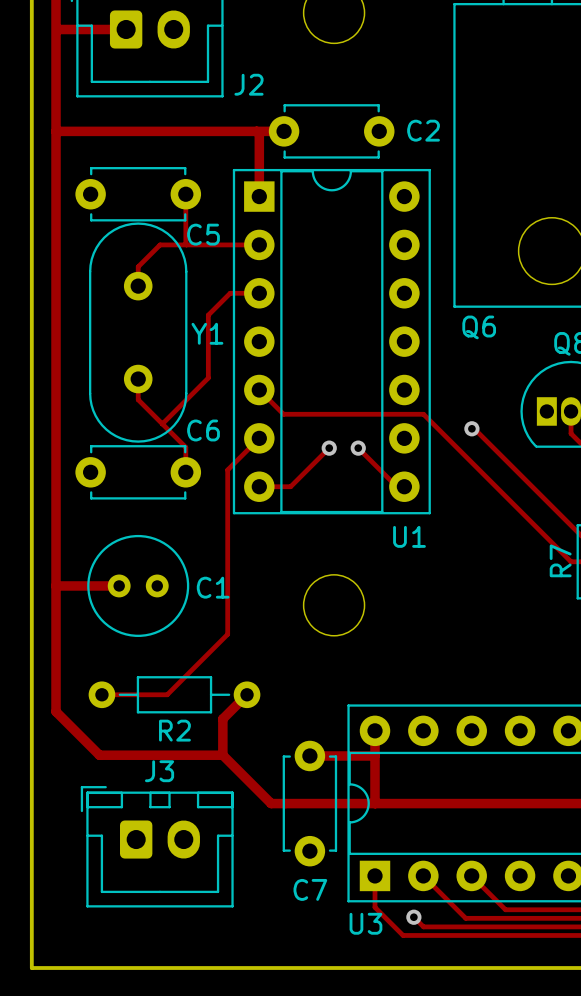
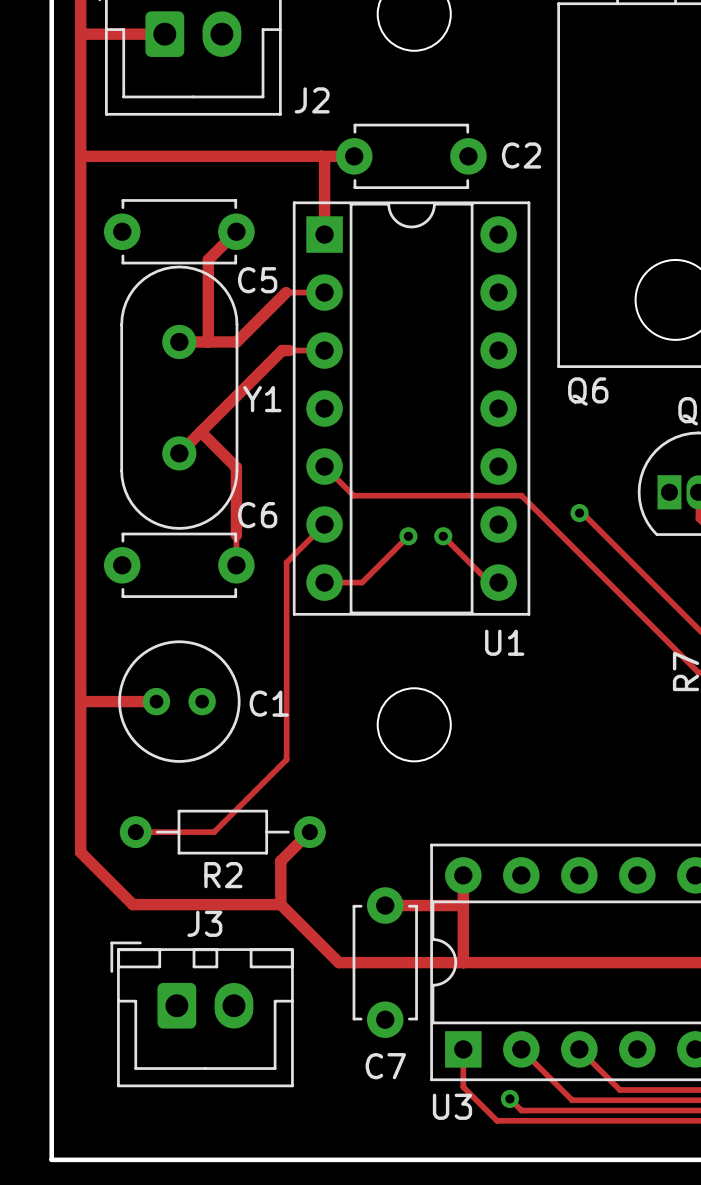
track: (185, 194) (186, 244) -> (236, 231) (208, 259) (207, 341)
track: (227, 244) (160, 244) (138, 266) (138, 286) -> (286, 292) (236, 341) (179, 341)
track: (230, 293) (208, 315) (208, 378) (162, 423) -> (289, 350) (282, 350) (179, 453)
track: (138, 379) (138, 399) (185, 447) -> (200, 431) (236, 467) (236, 535)

